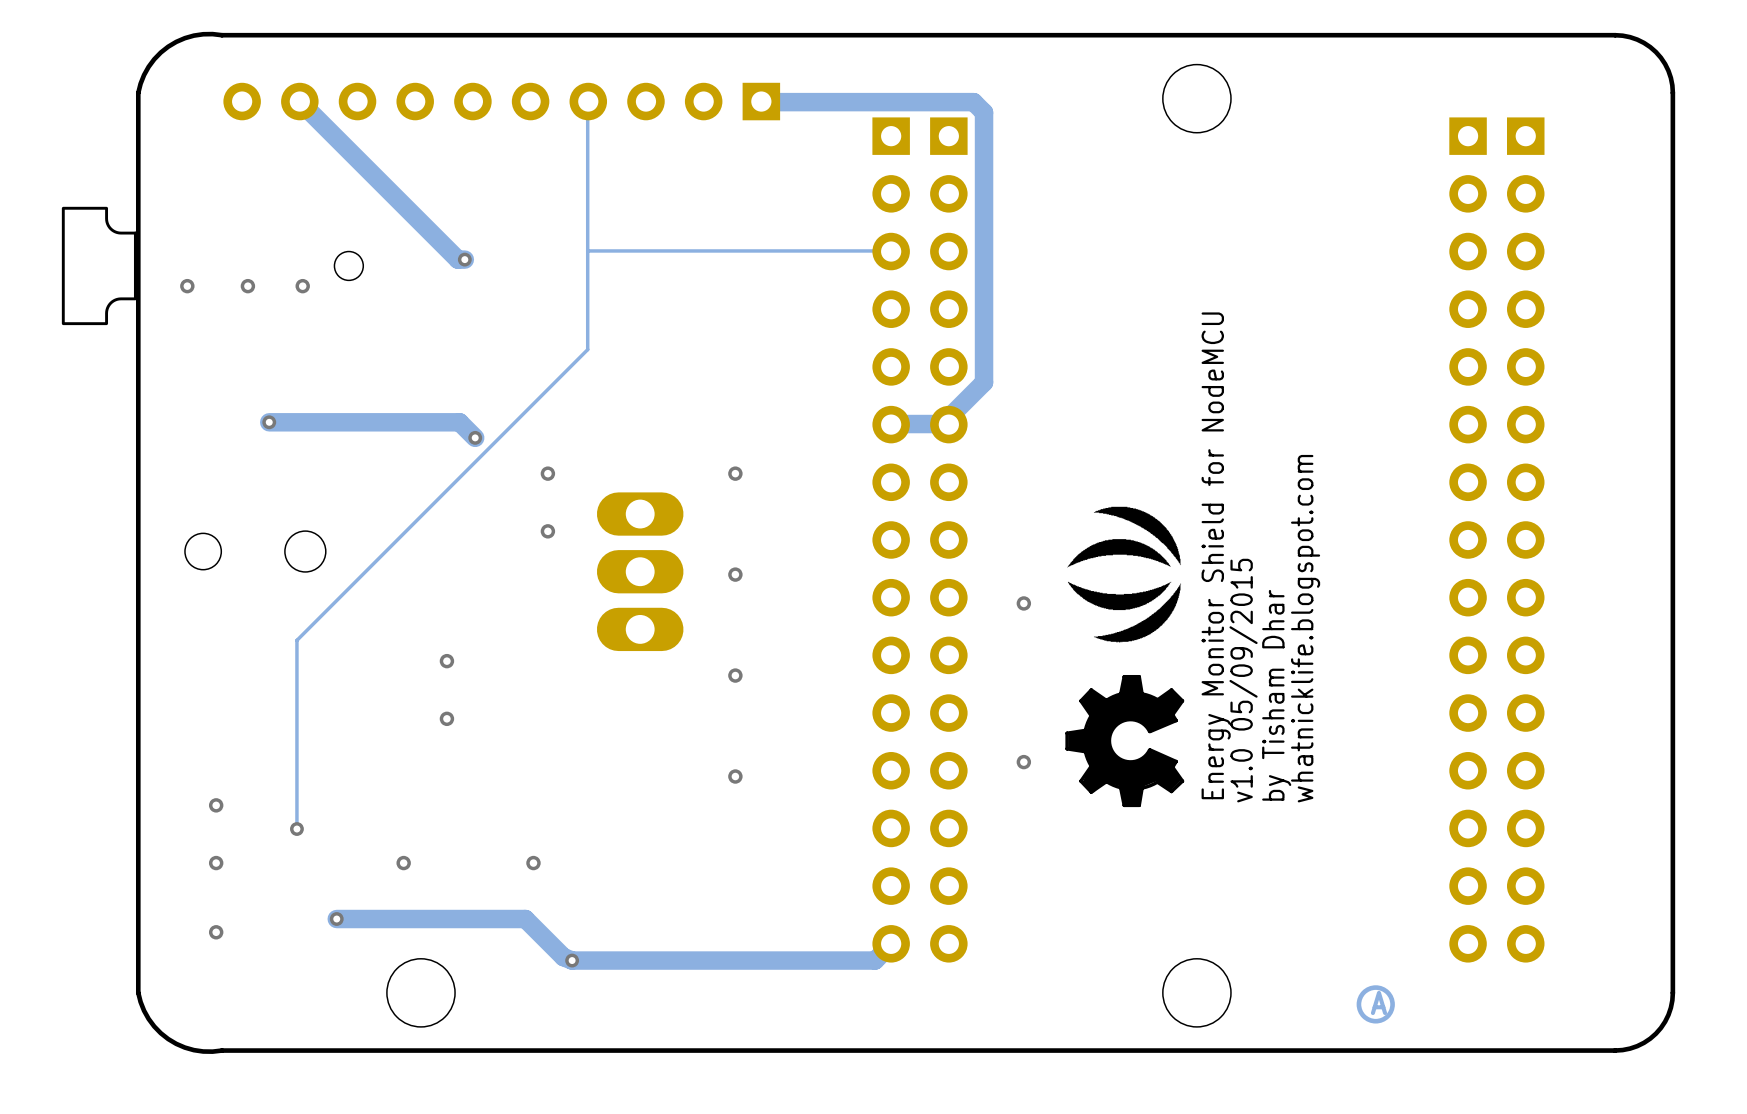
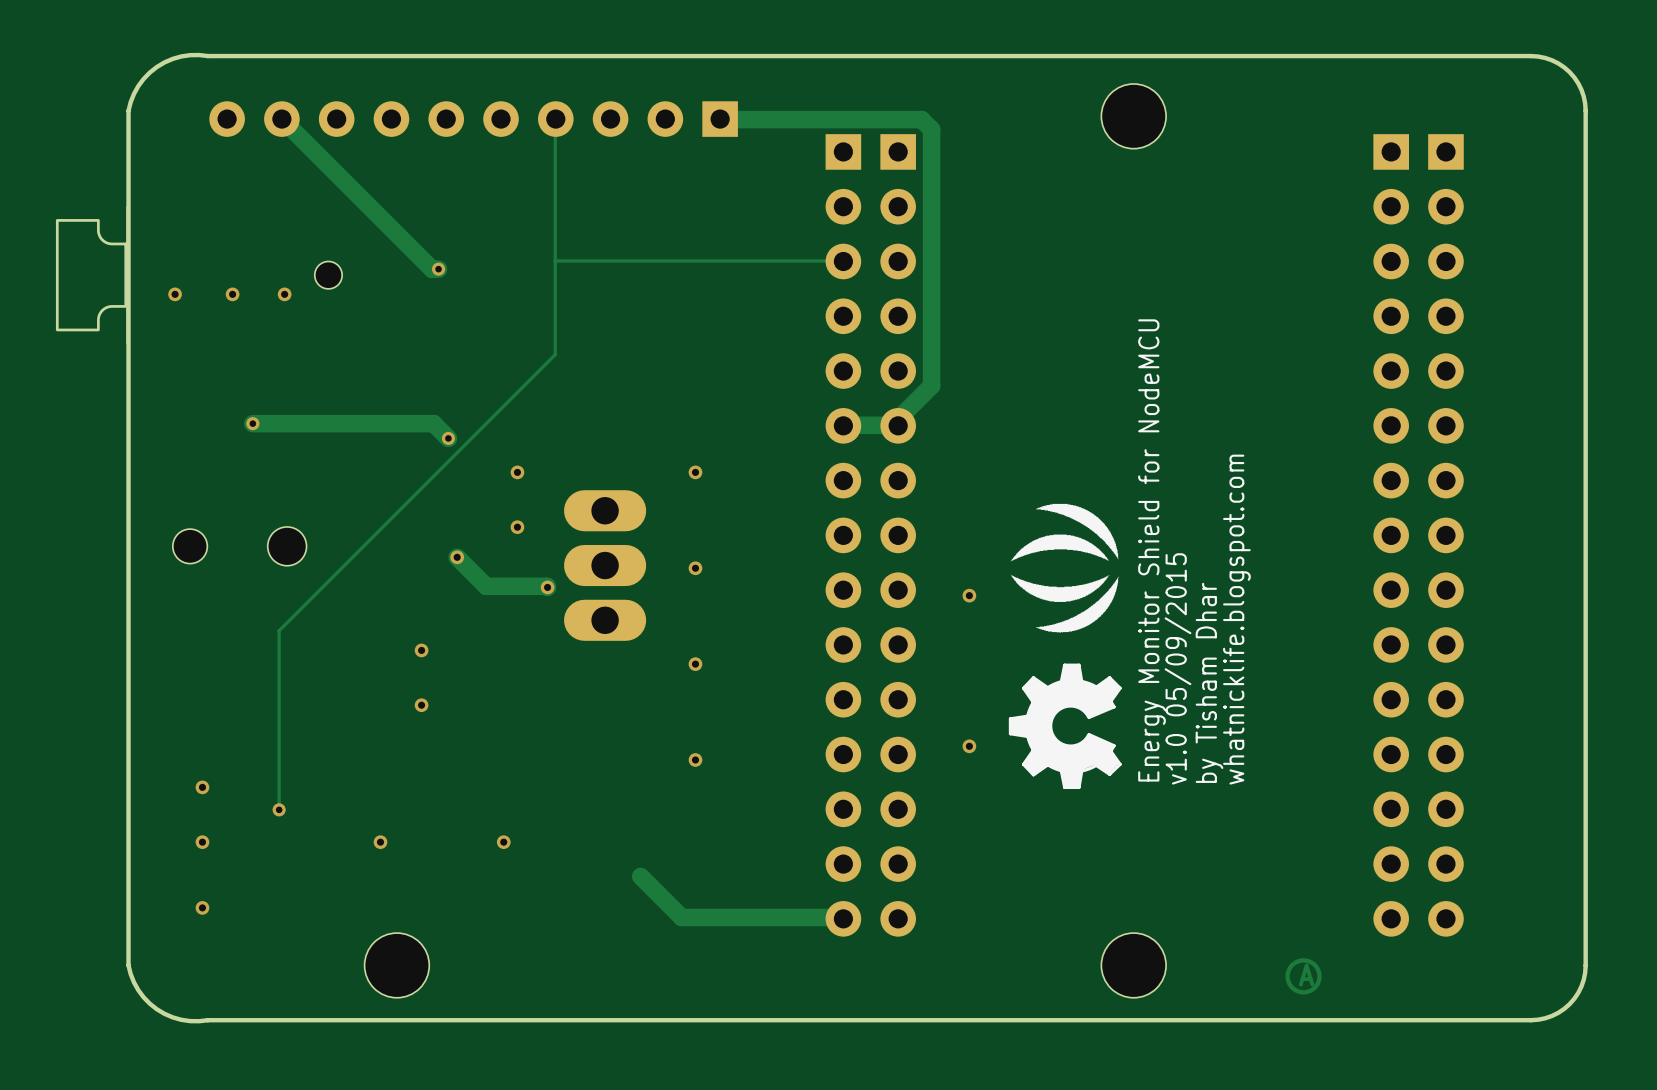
track: none -> (457, 557) (486, 586) (547, 587)
via: none -> (457, 557)
via: none -> (547, 587)
track: (336, 919) (525, 919) (563, 957) (572, 960) (875, 960) (891, 943) -> (640, 876) (681, 917) (843, 918)
via: (336, 919) -> none
via: (572, 960) -> none

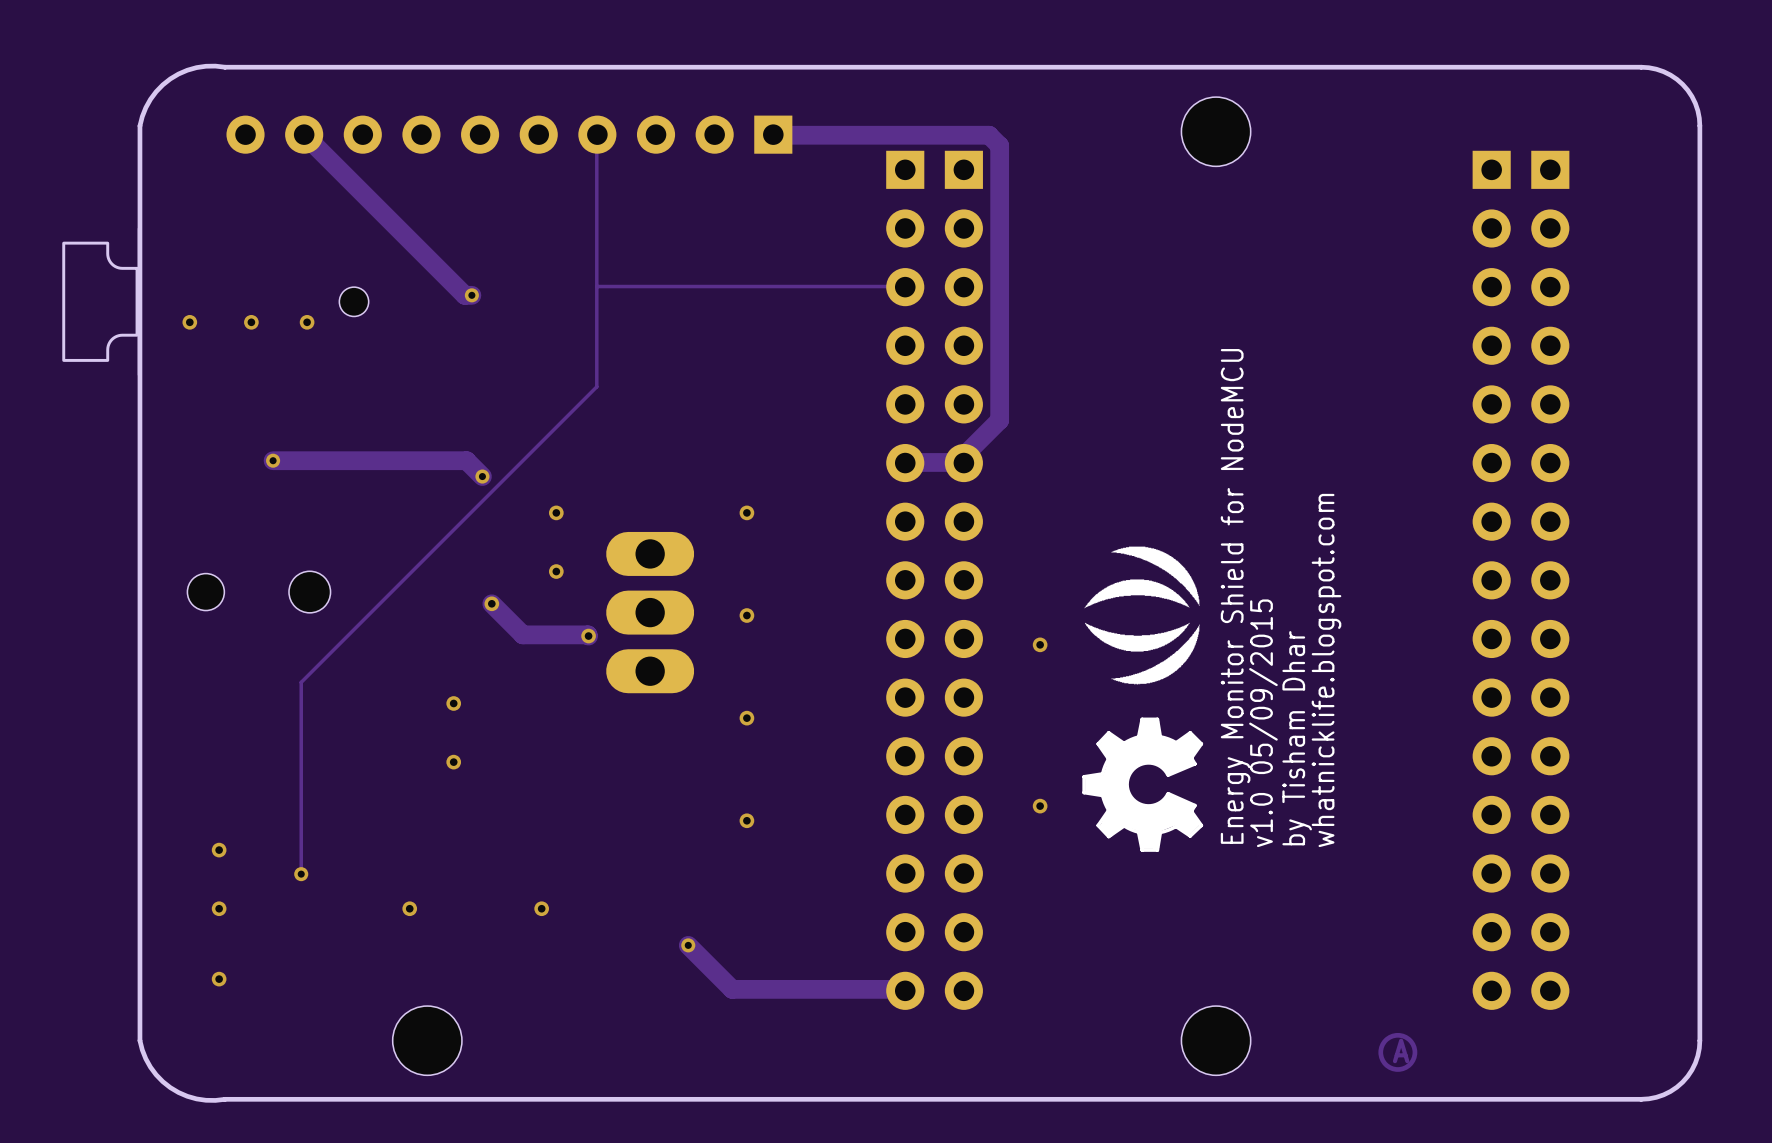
via: none -> (688, 945)

